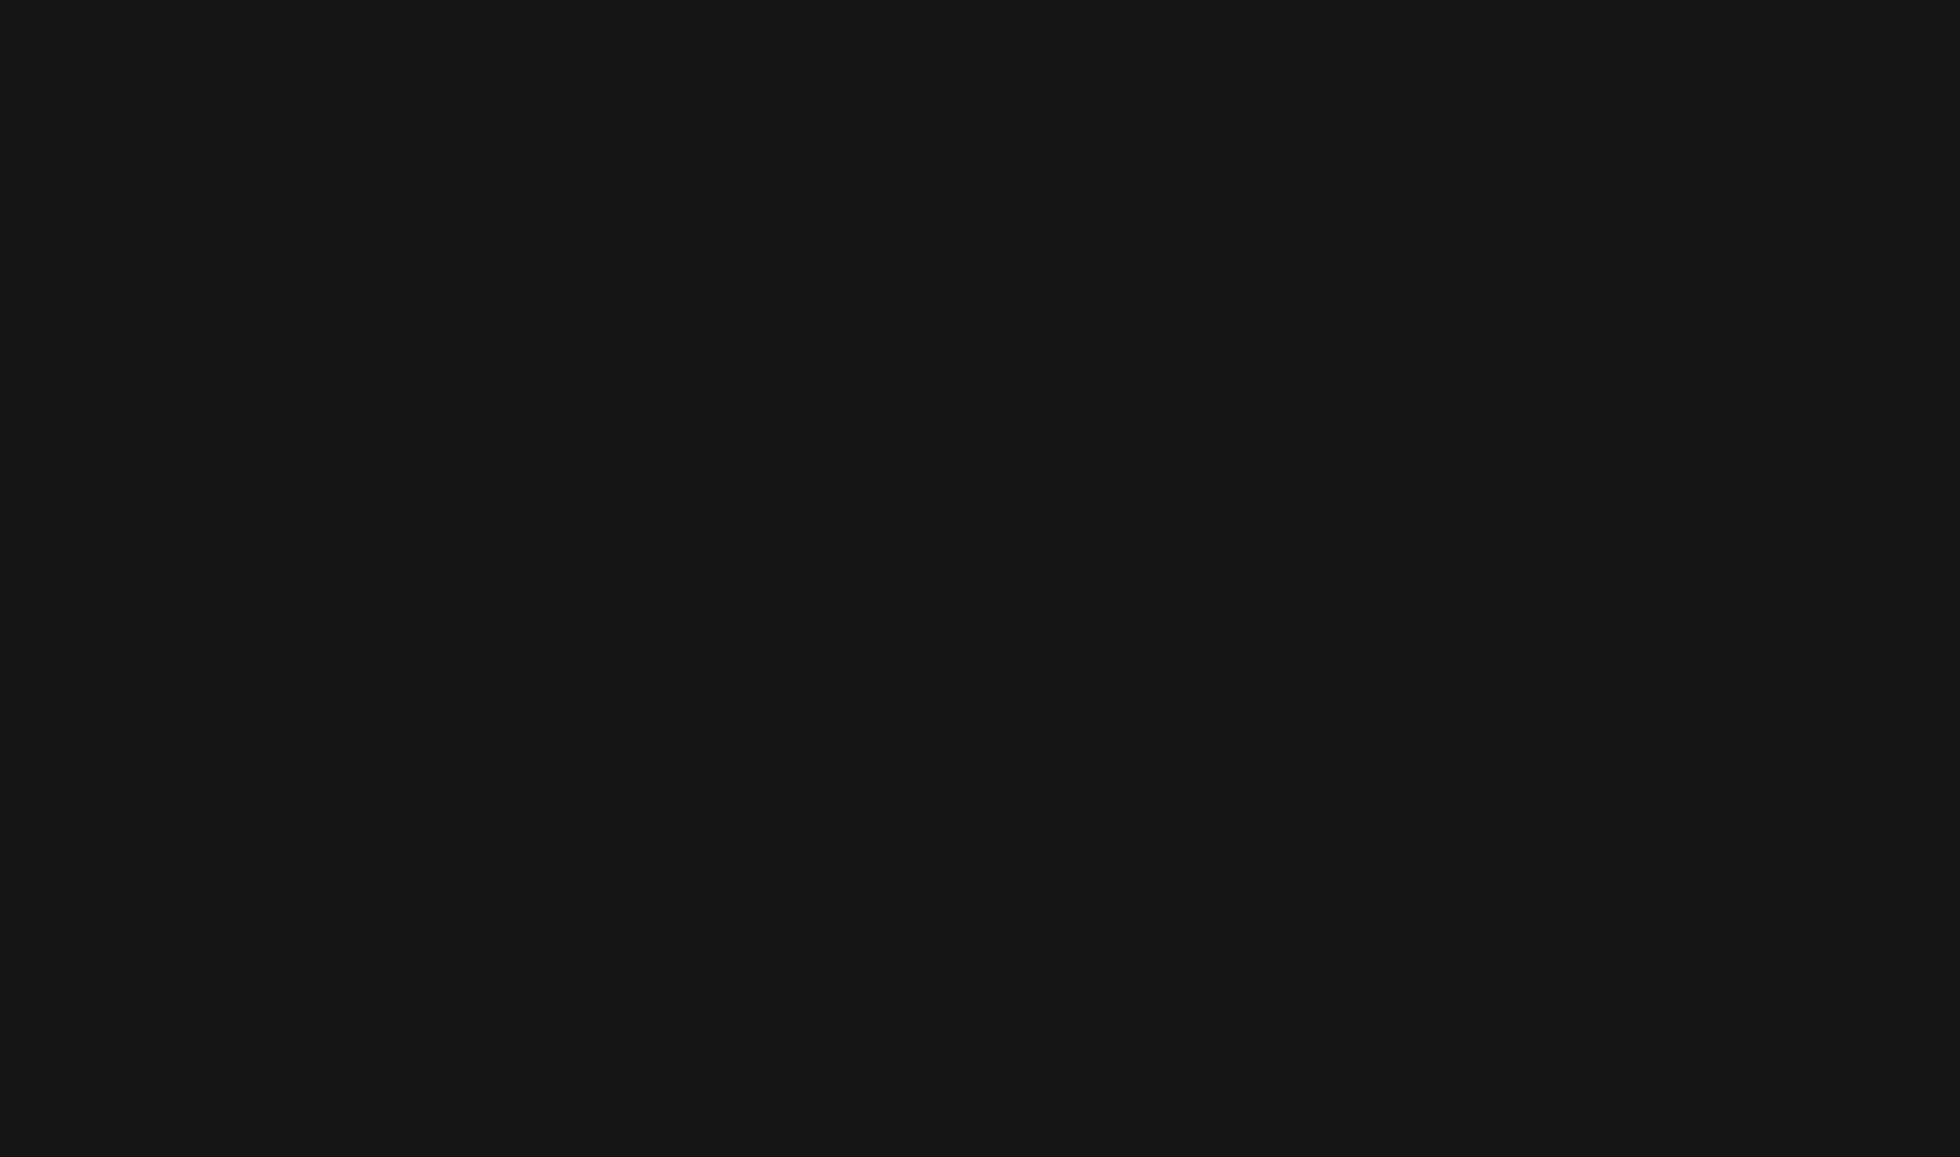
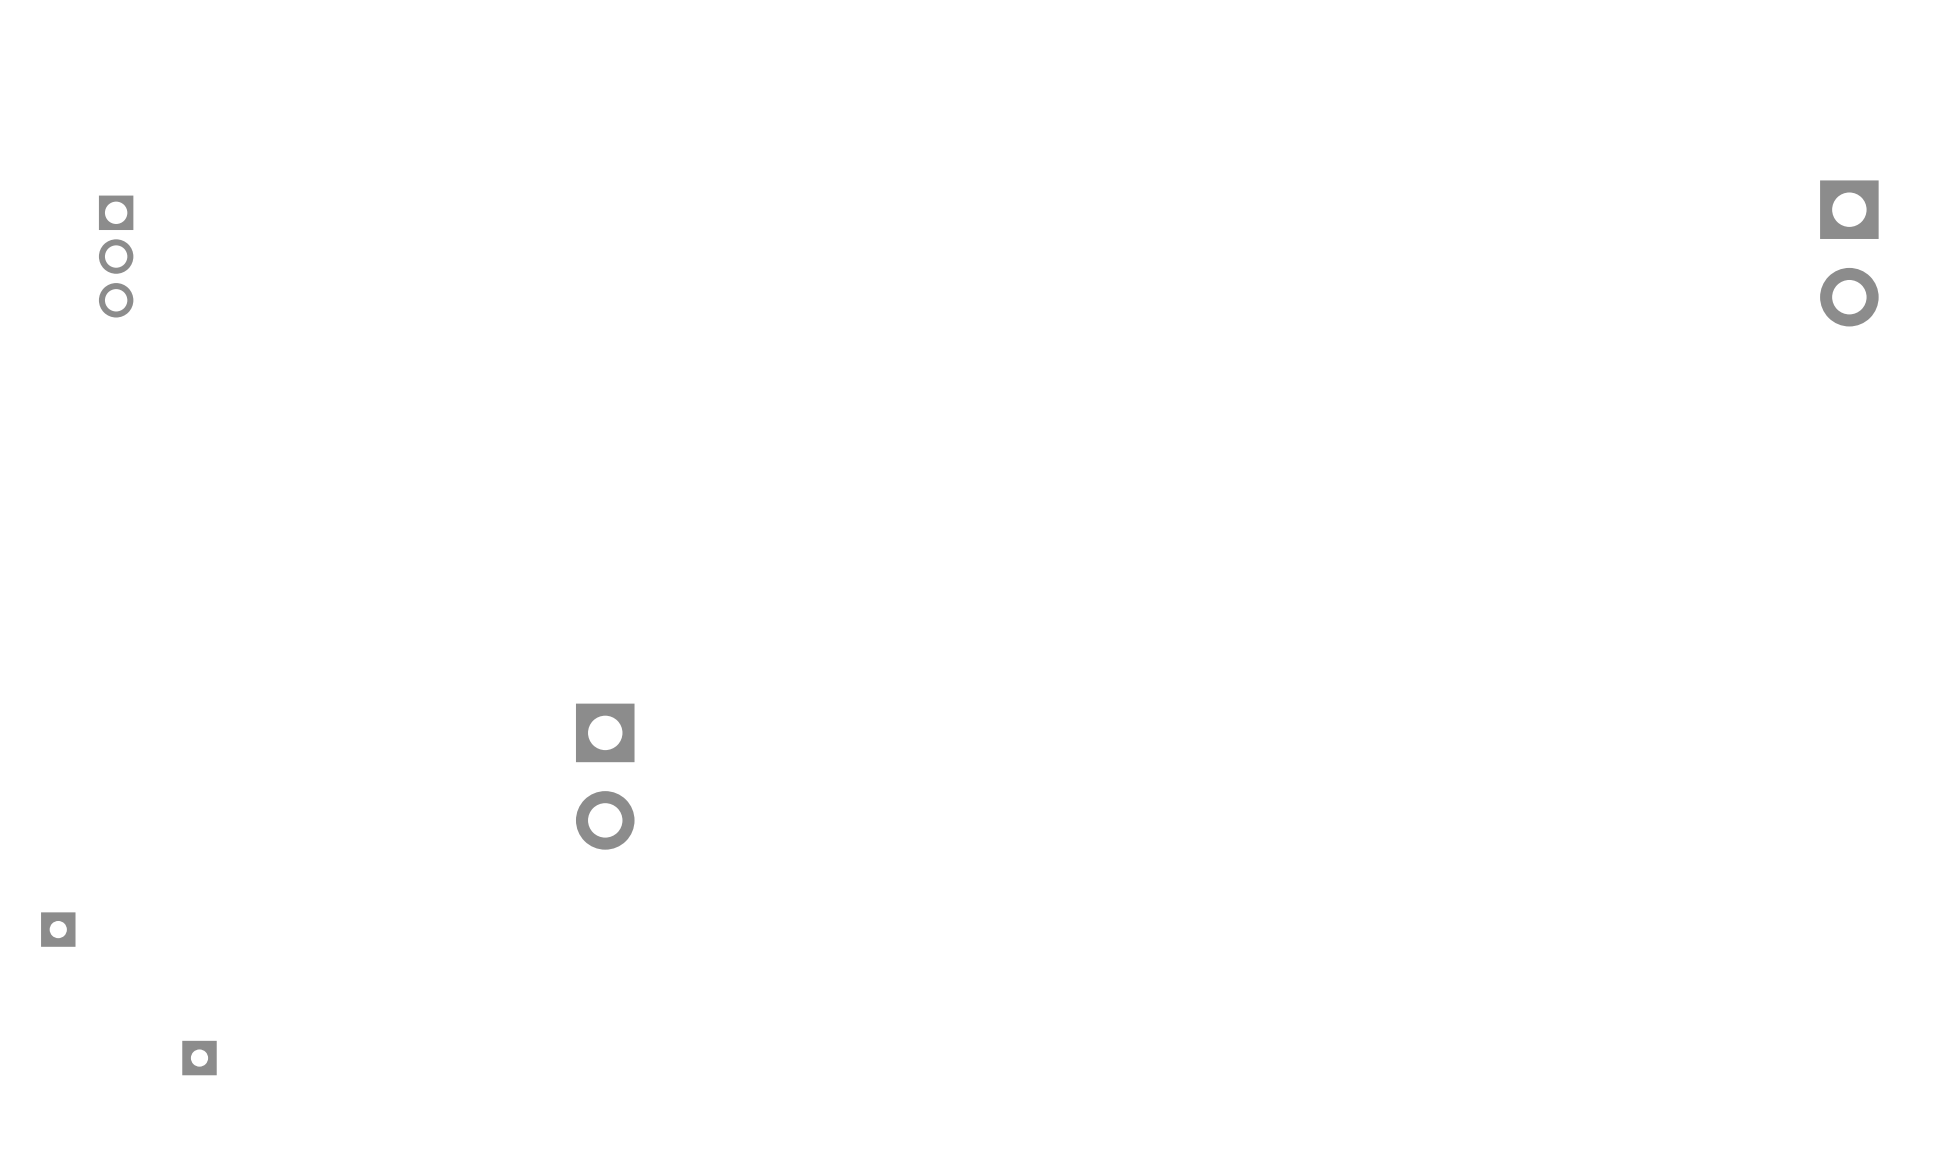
part: none -> (1849, 253)
part: none -> (116, 256)
part: none -> (605, 776)
part: none -> (58, 929)
part: none -> (199, 1058)

